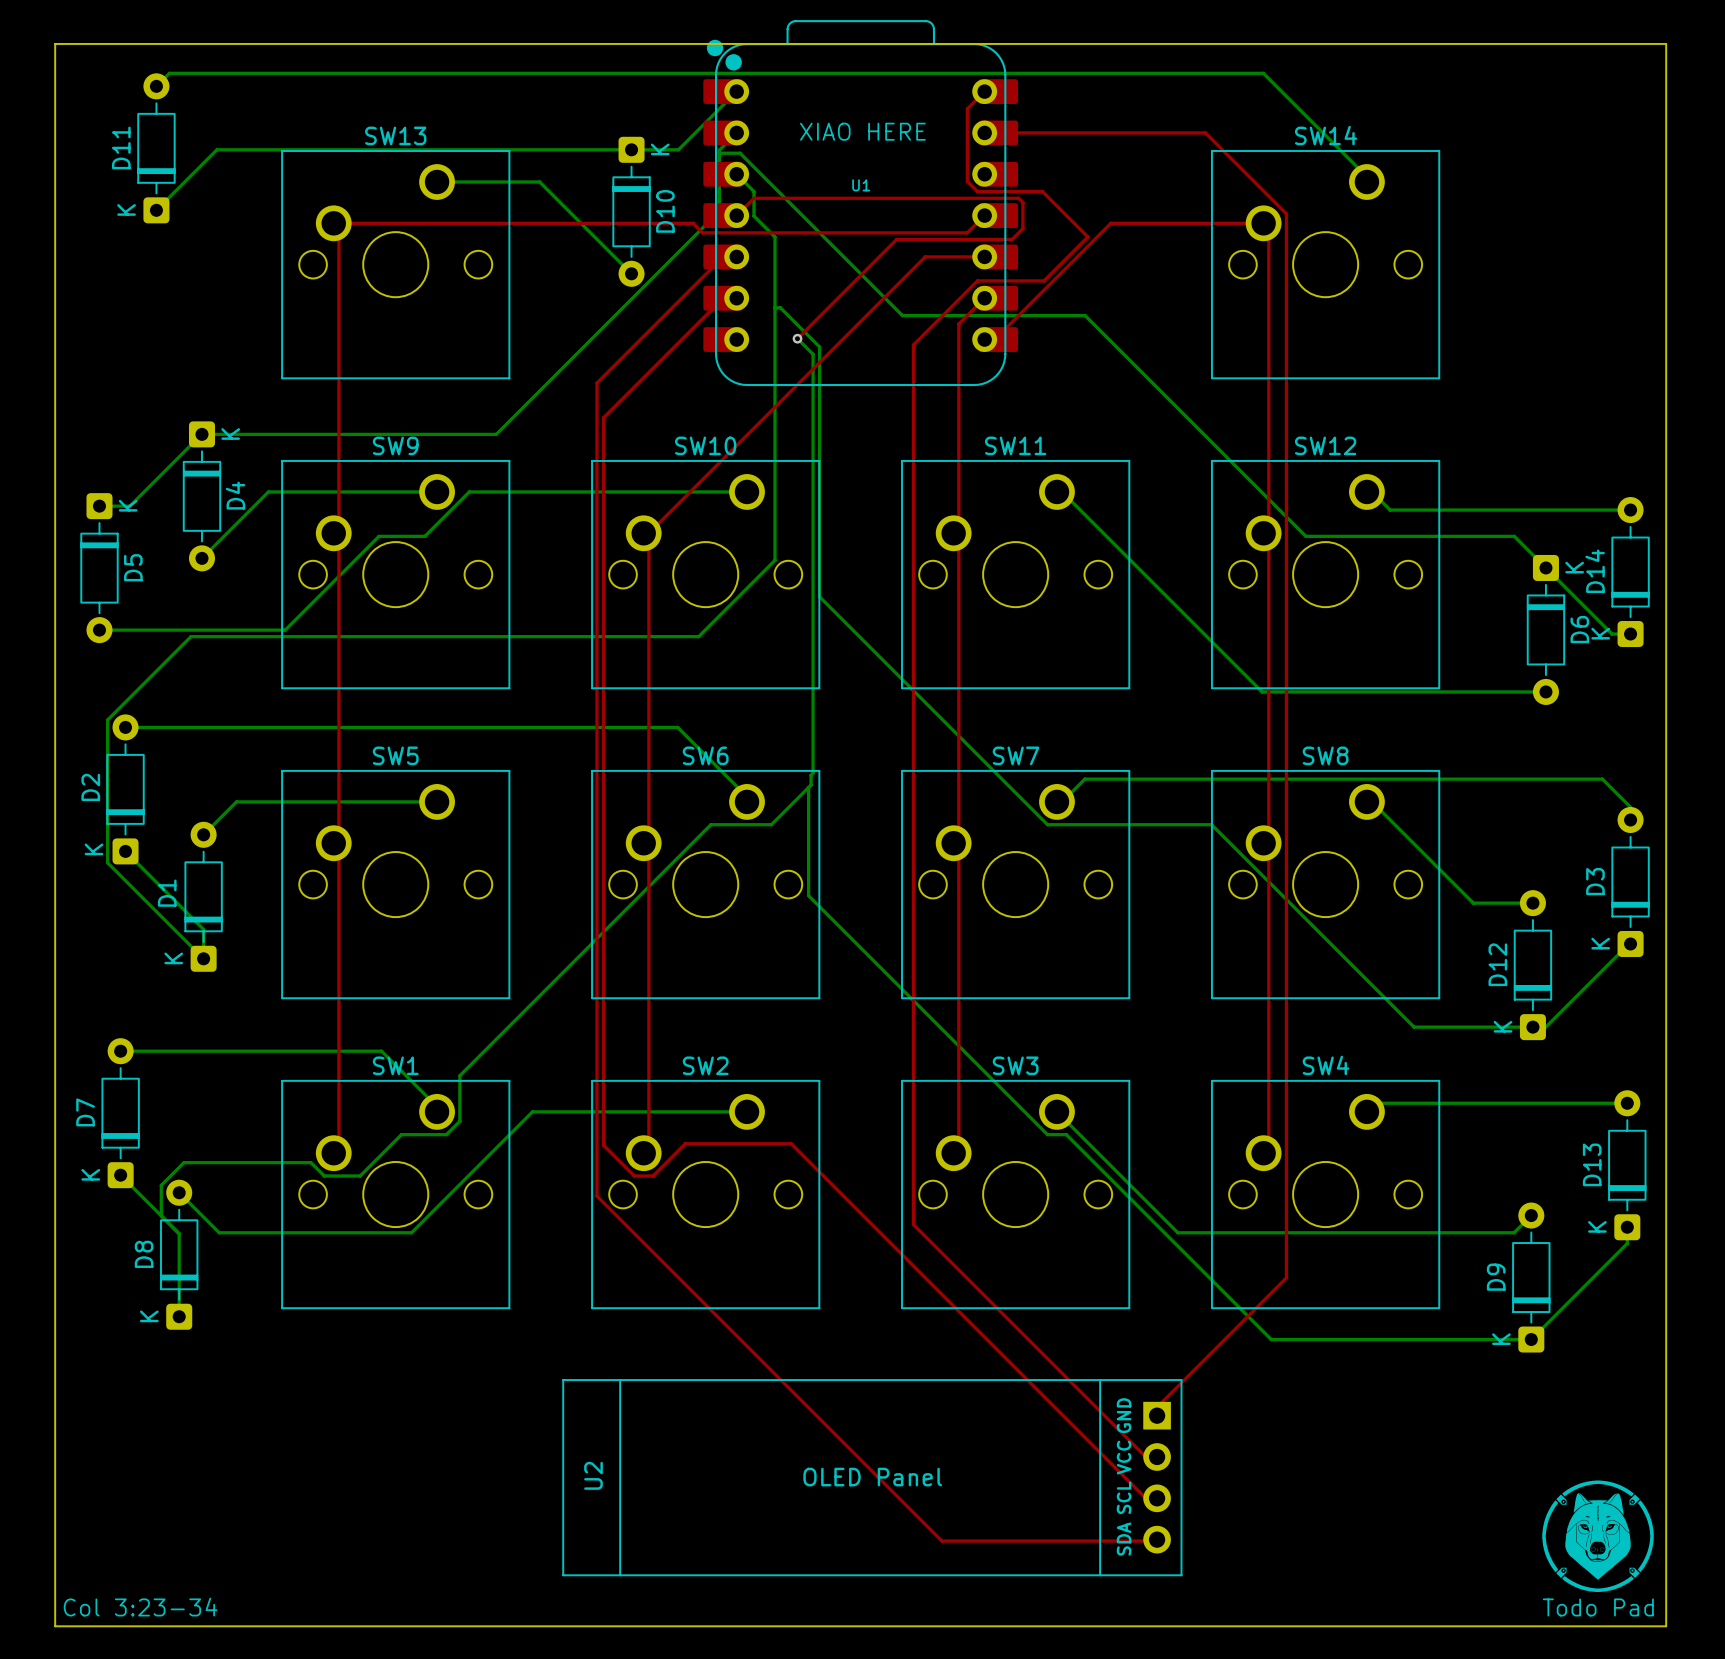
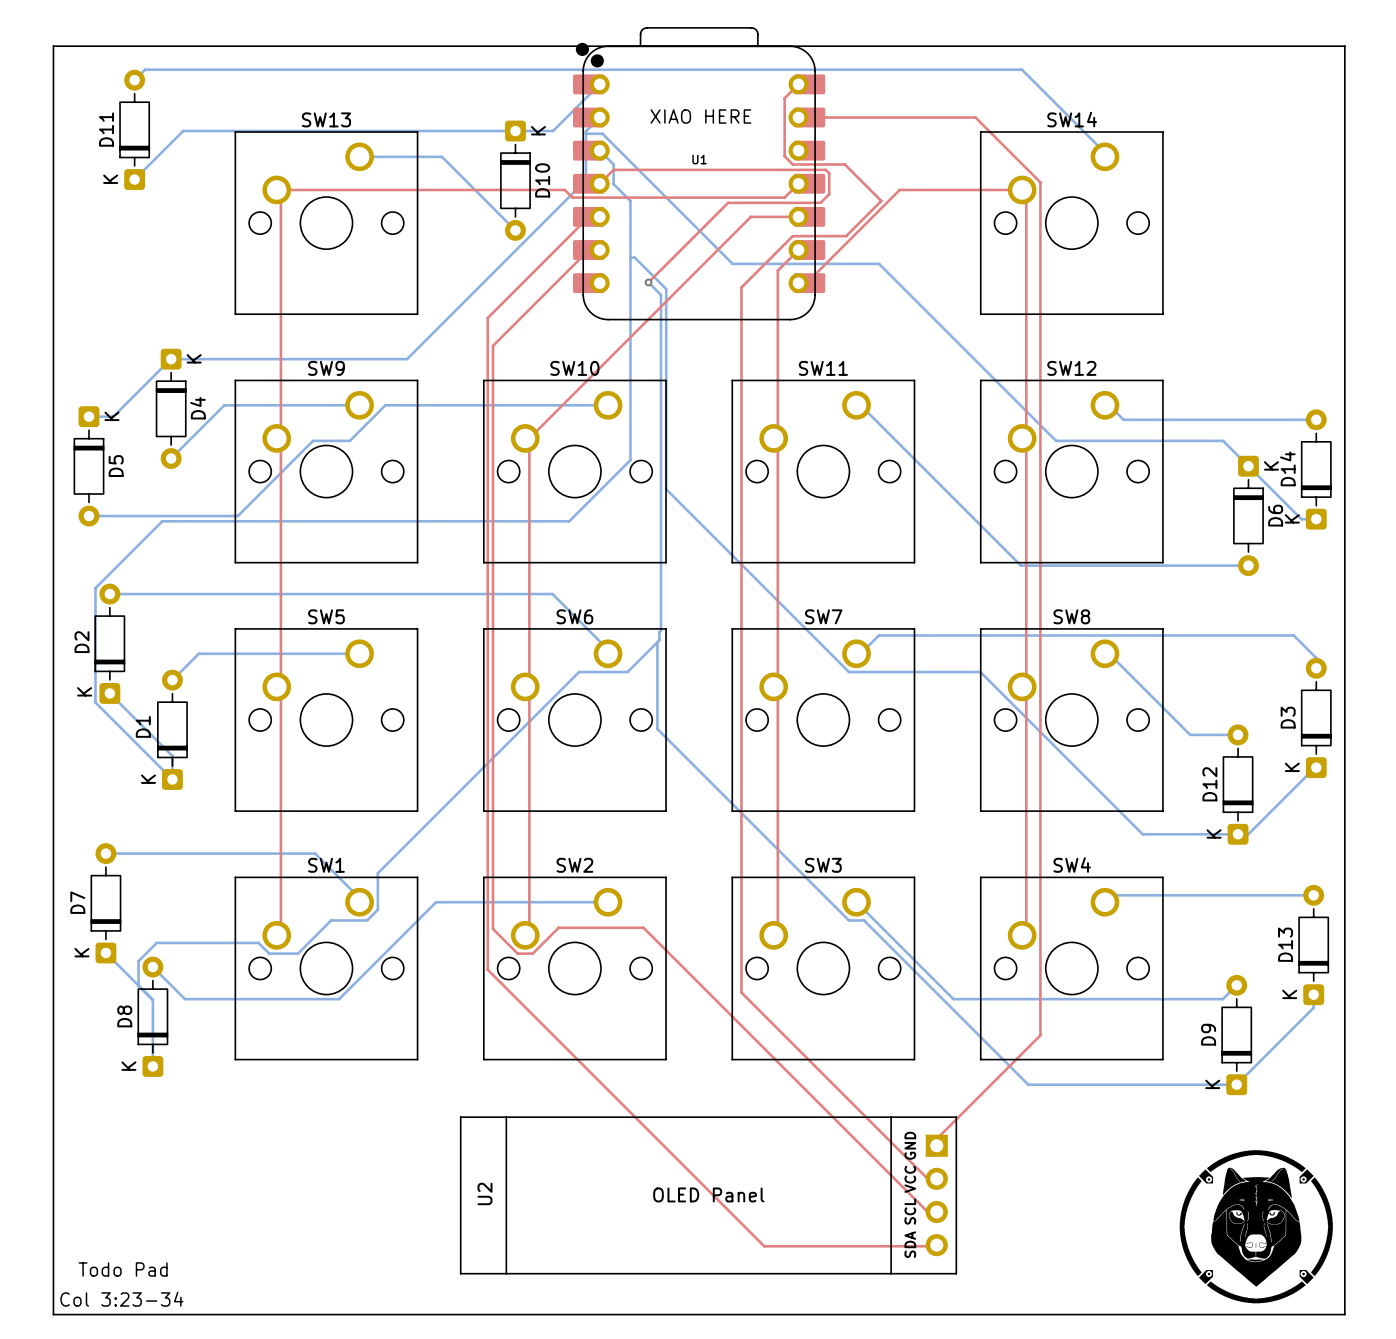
drawing: none -> [1179, 1150, 1333, 1304]
drawing: [1542, 1480, 1654, 1592] -> none
text: none -> Todo Pad (123, 1269)
text: Todo Pad (1598, 1607) -> none

